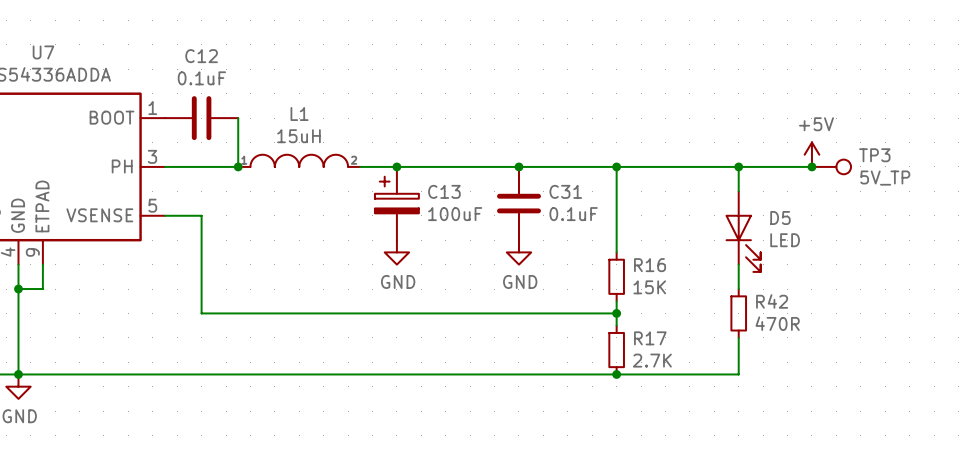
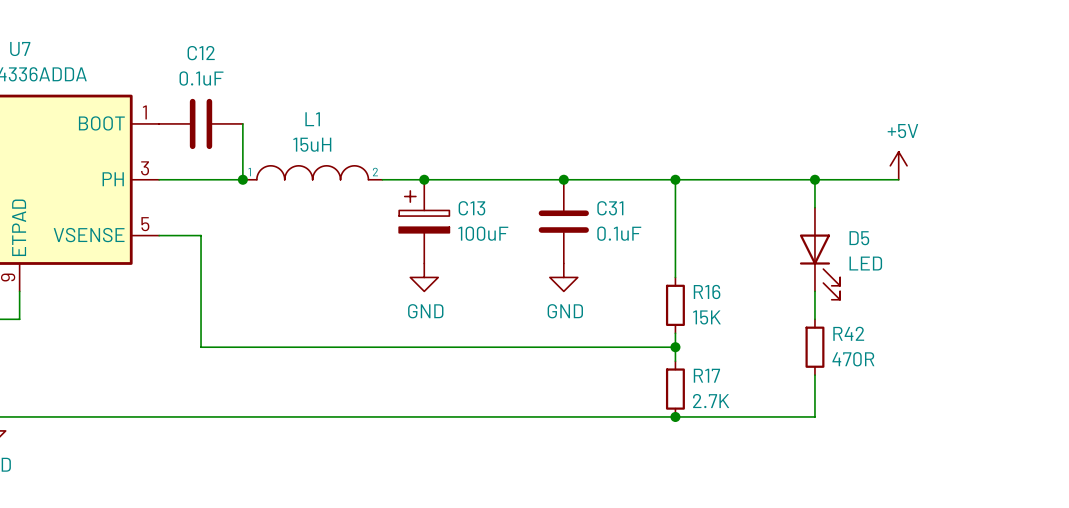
junction: (811, 166) -> none
TP3: 5V_TP (831, 166) -> none

